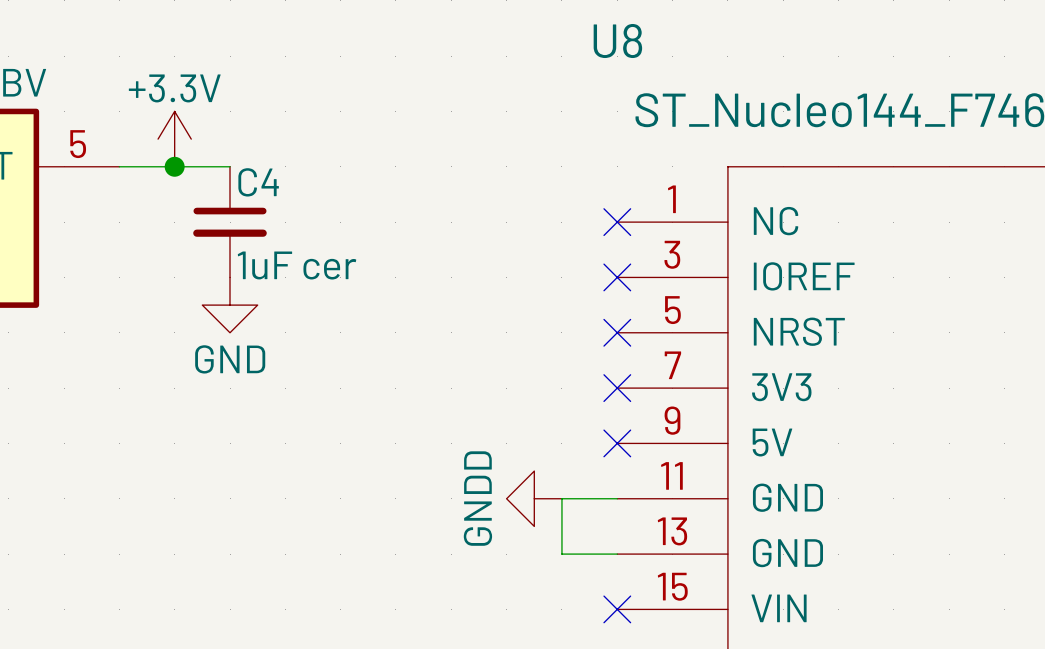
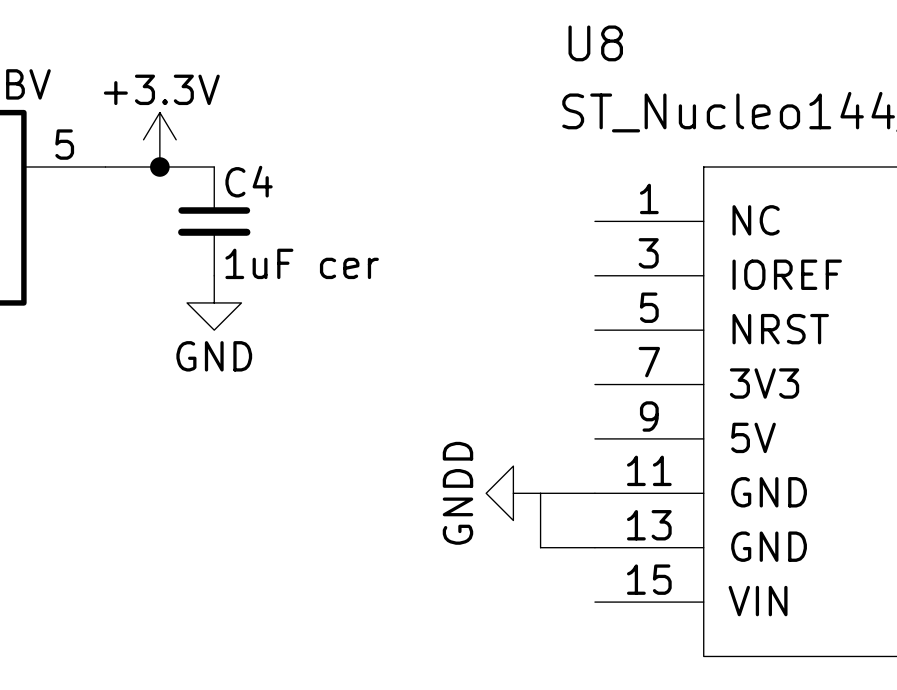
no-connect mark: (617, 222) -> none
no-connect mark: (617, 277) -> none
no-connect mark: (617, 332) -> none
no-connect mark: (617, 388) -> none
no-connect mark: (617, 443) -> none
no-connect mark: (617, 609) -> none

